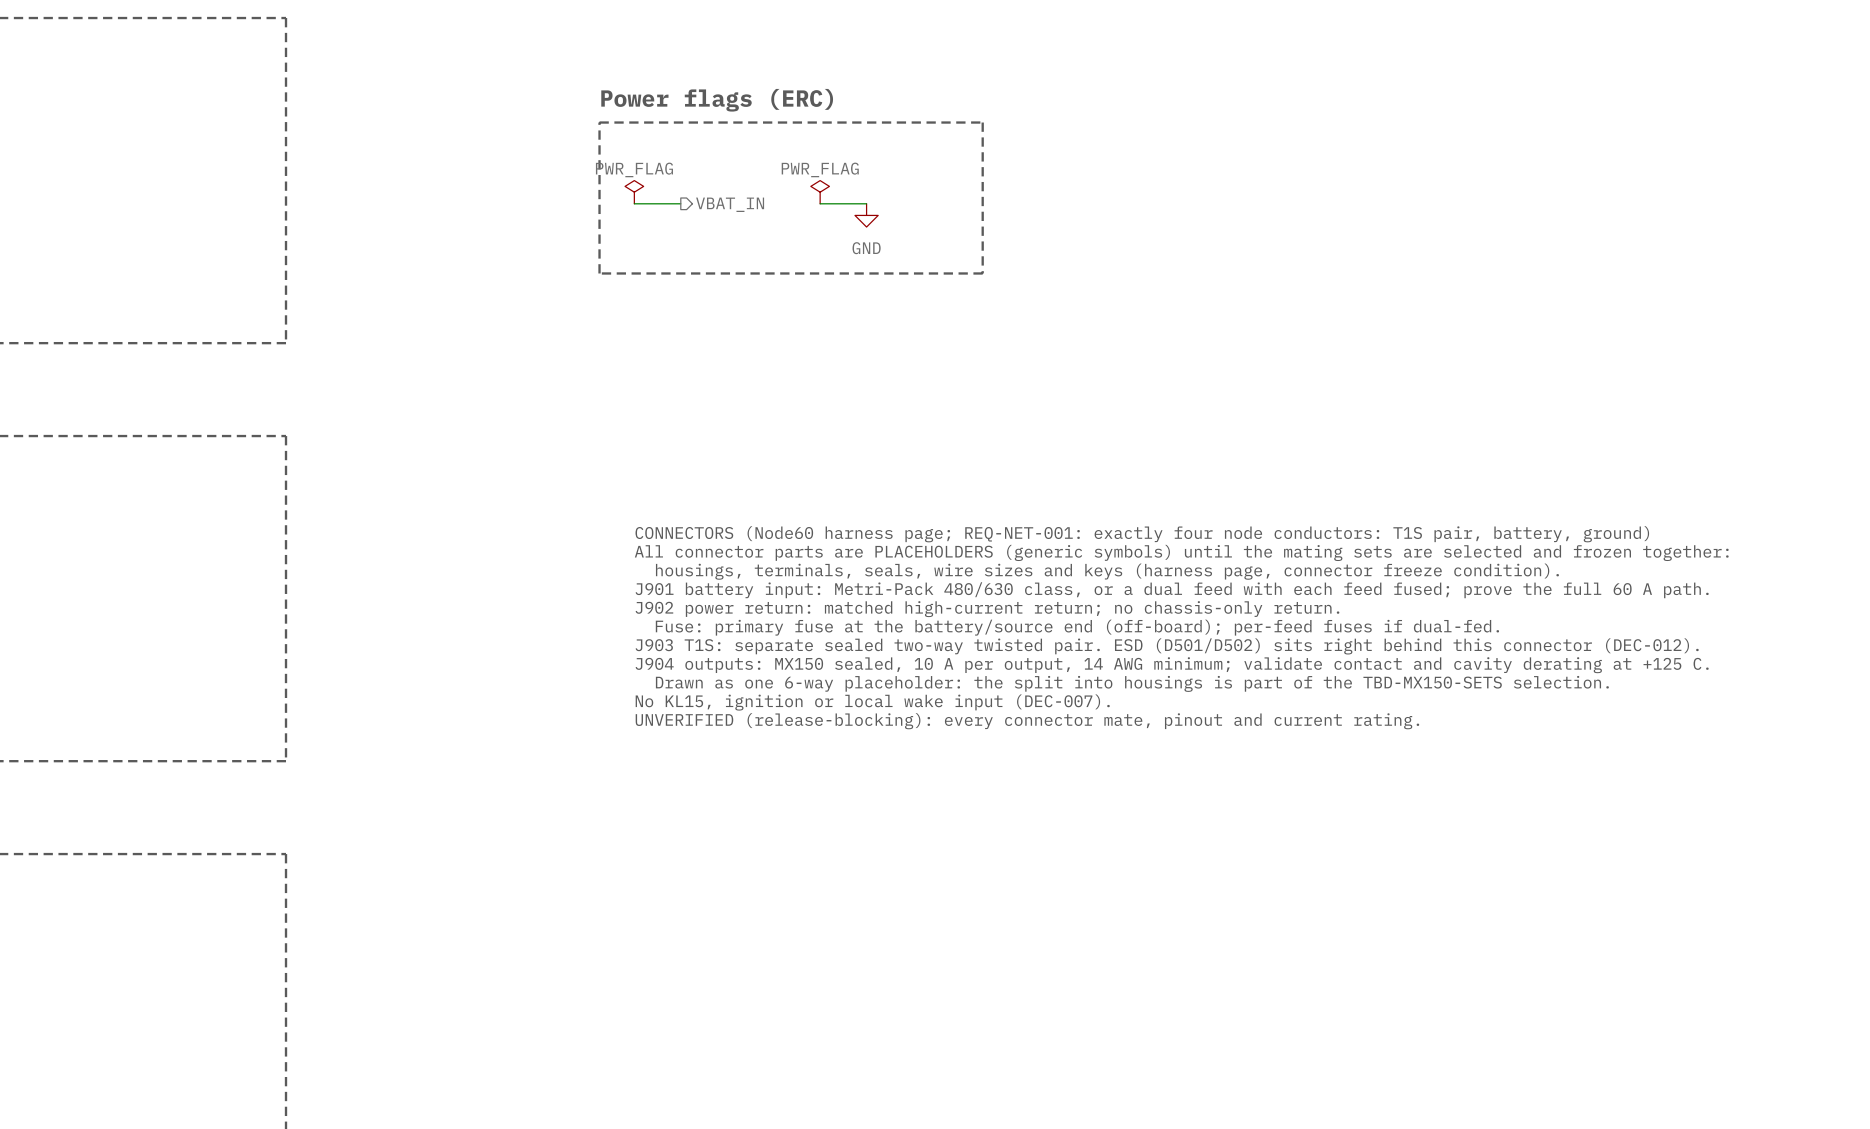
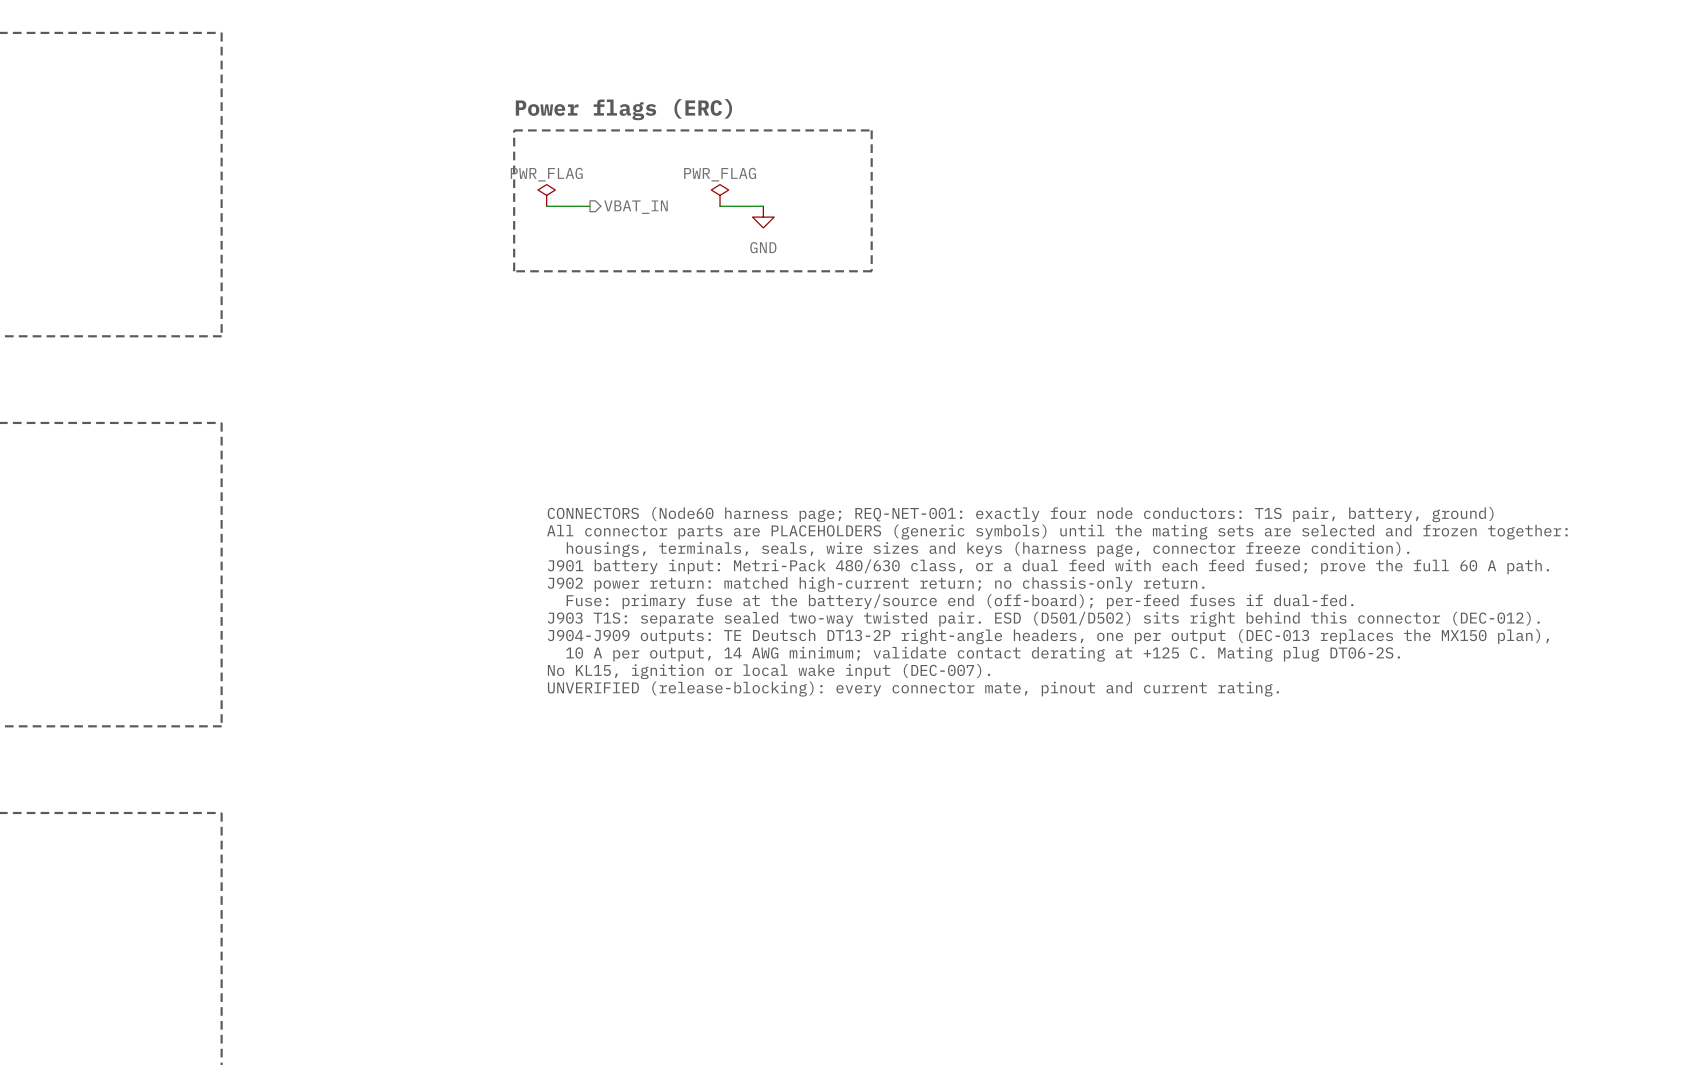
text: J904 outputs: MX150 sealed, 10 A per output, 14 AWG minimum; validate contact and cavity derating at +125 C. (1172, 665) -> J904-J909 outputs: TE Deutsch DT13-2P right-angle headers, one per output (DEC-013 replaces the MX150 plan), (1048, 636)
text: Drawn as one 6-way placeholder: the split into housings is part of the TBD-MX150-SETS selection. (1132, 683) -> 10 A per output, 14 AWG minimum; validate contact derating at +125 C. Mating plug DT06-2S. (983, 654)

